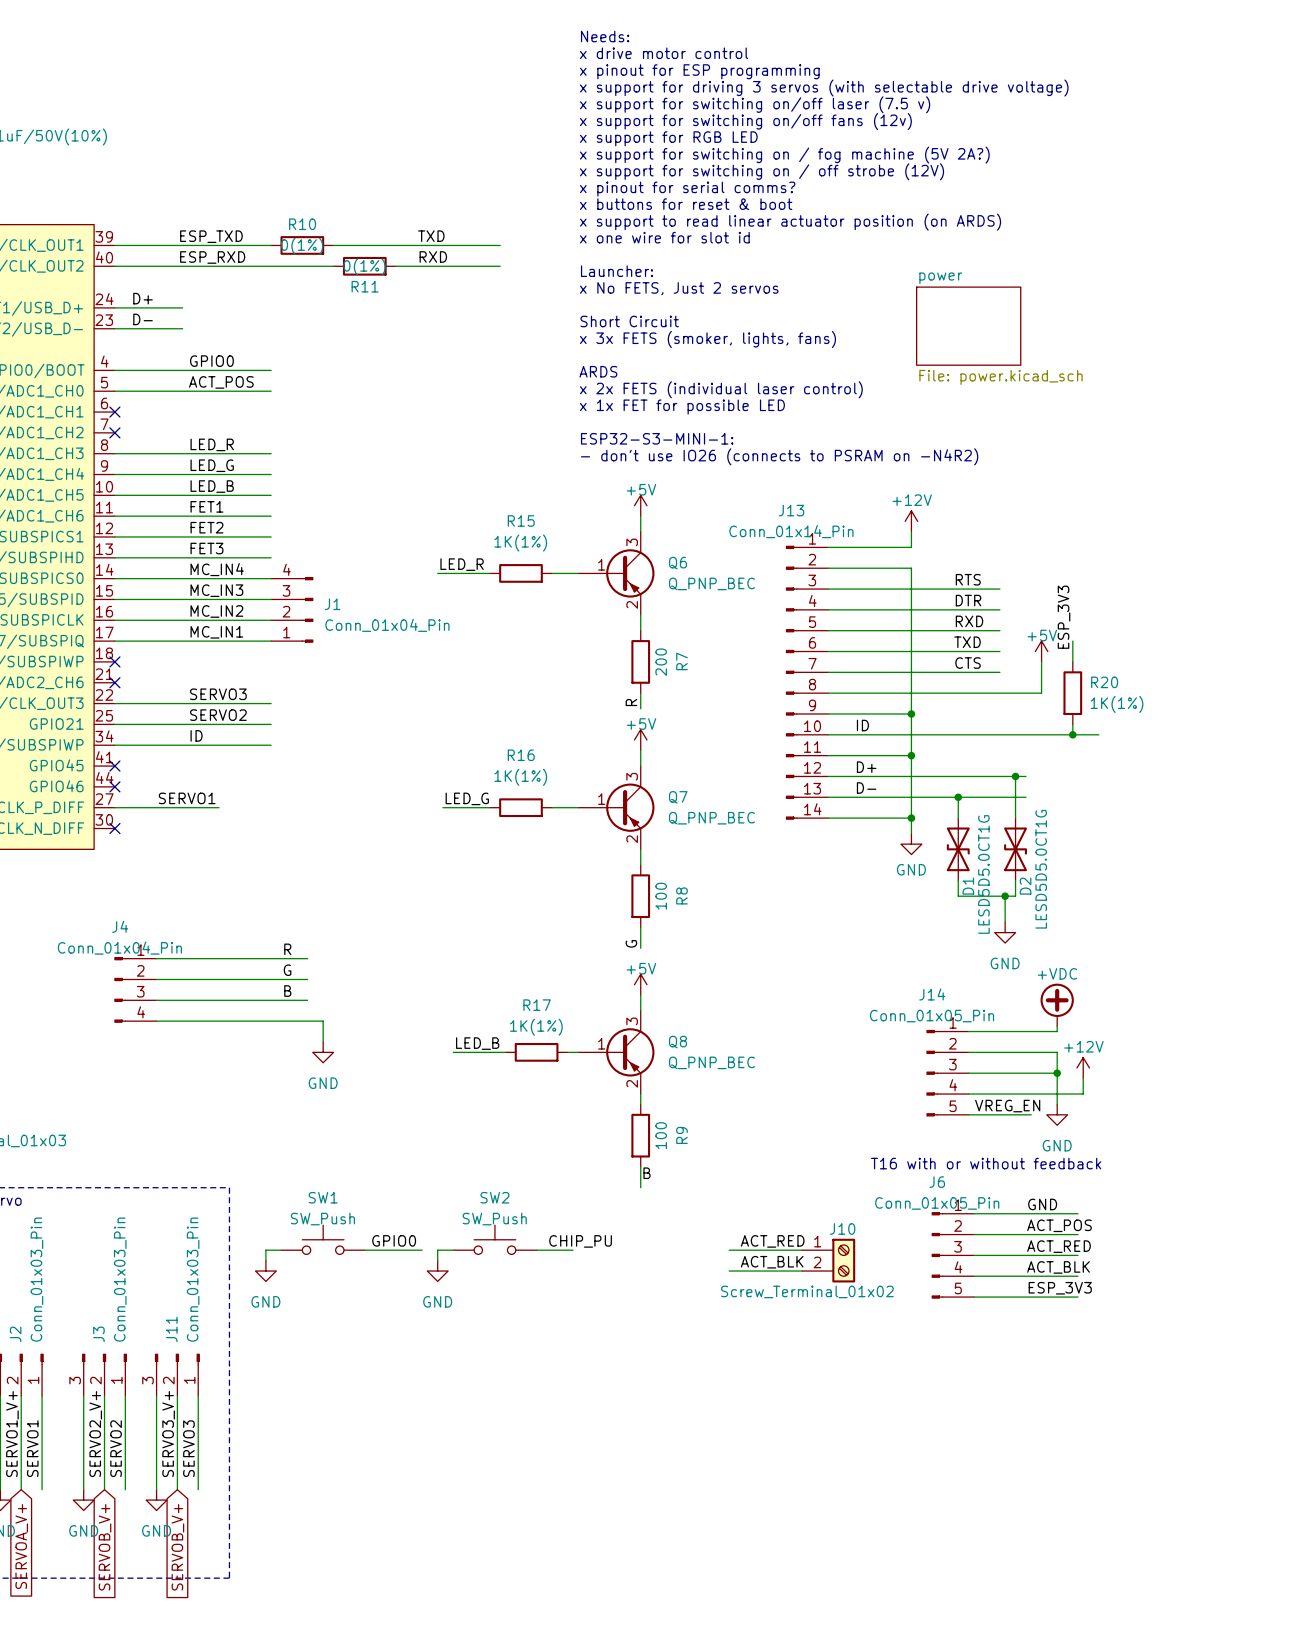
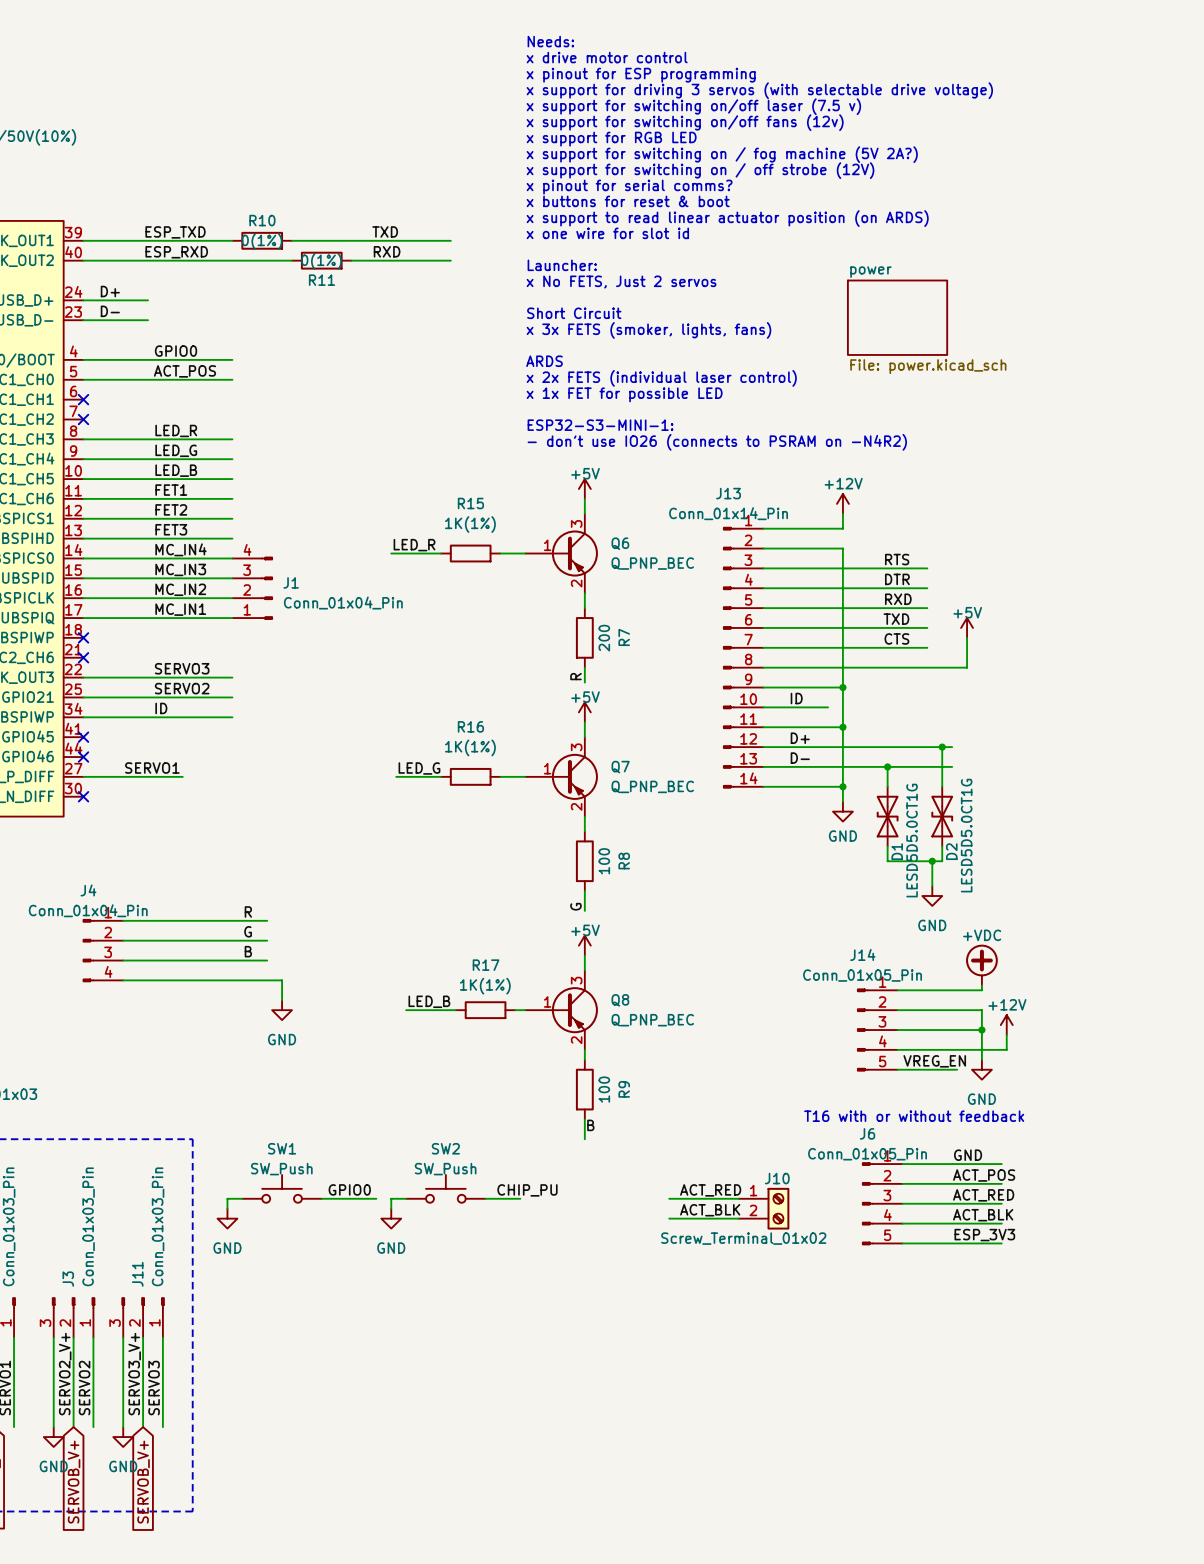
label: ESP_3V3 (1064, 617) -> none
wire: (1072, 641) (1072, 661) -> none
R20: 1K(1%) (1072, 693) -> none
wire: (1072, 724) (1072, 734) -> none
wire: (895, 734) (1098, 734) -> none
junction: (1072, 734) -> none

